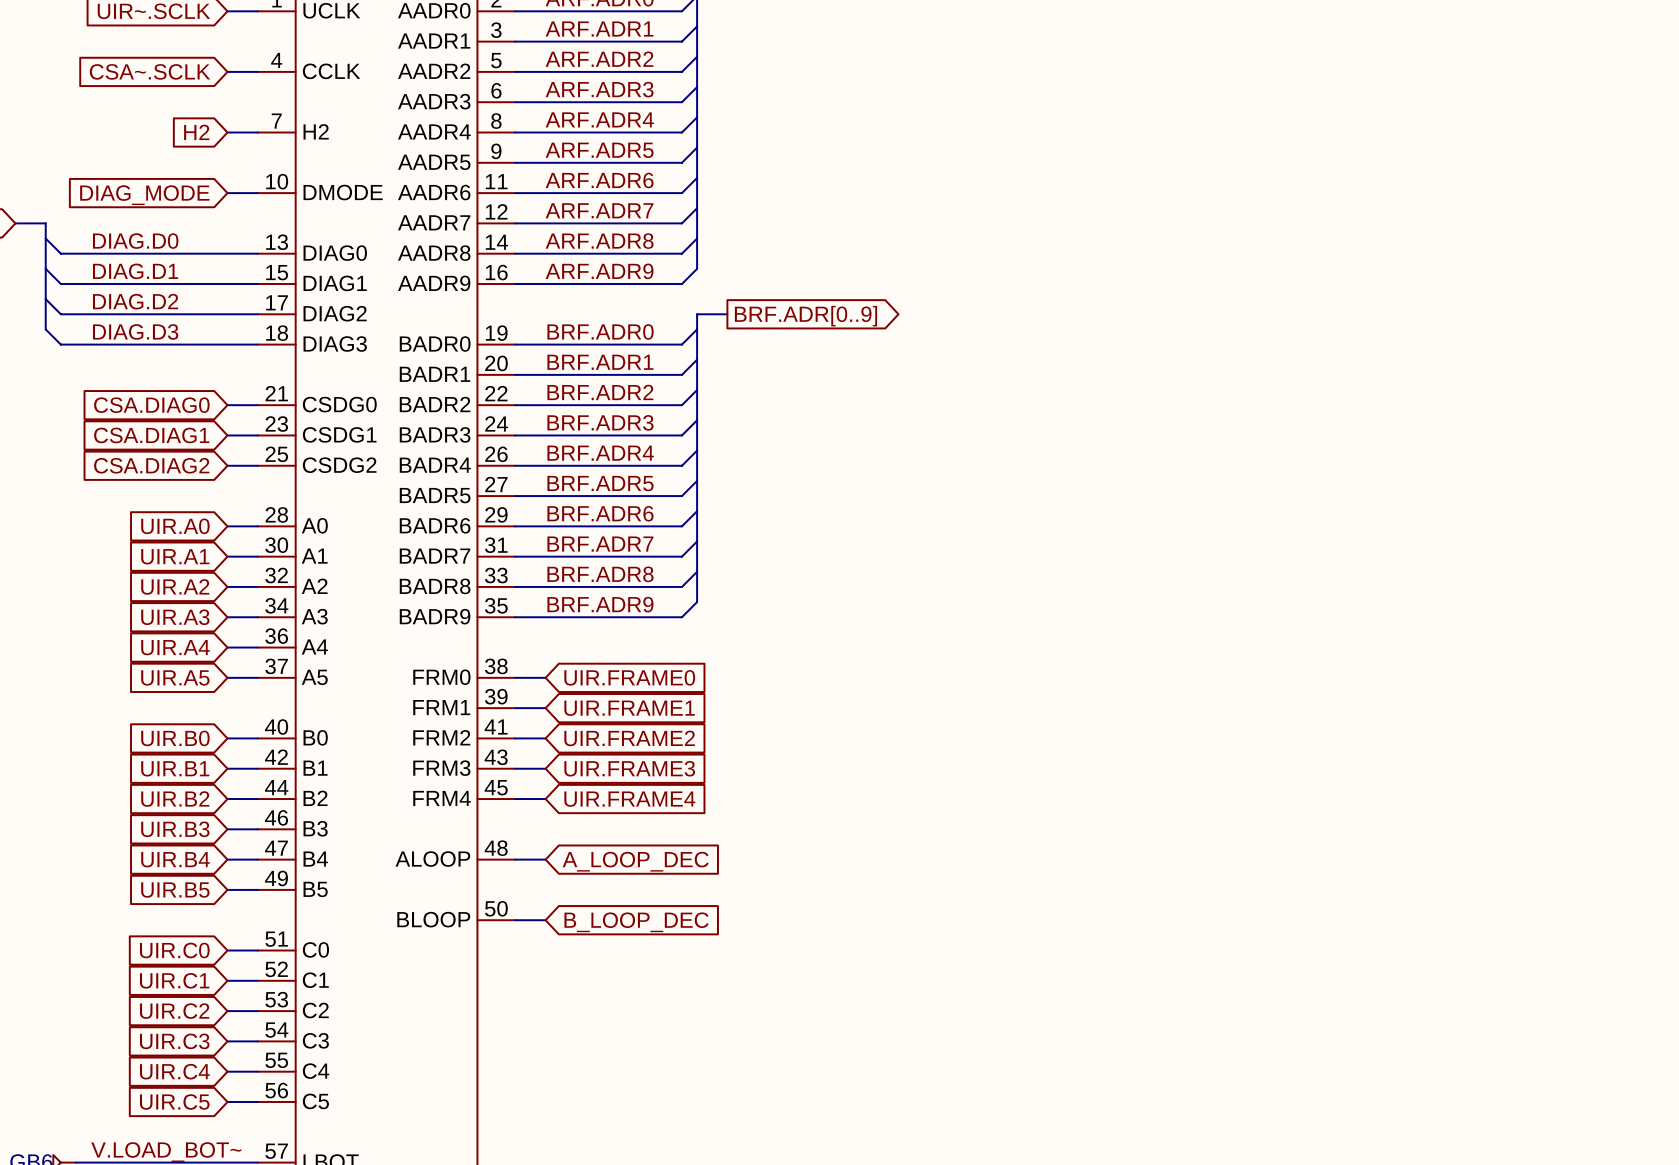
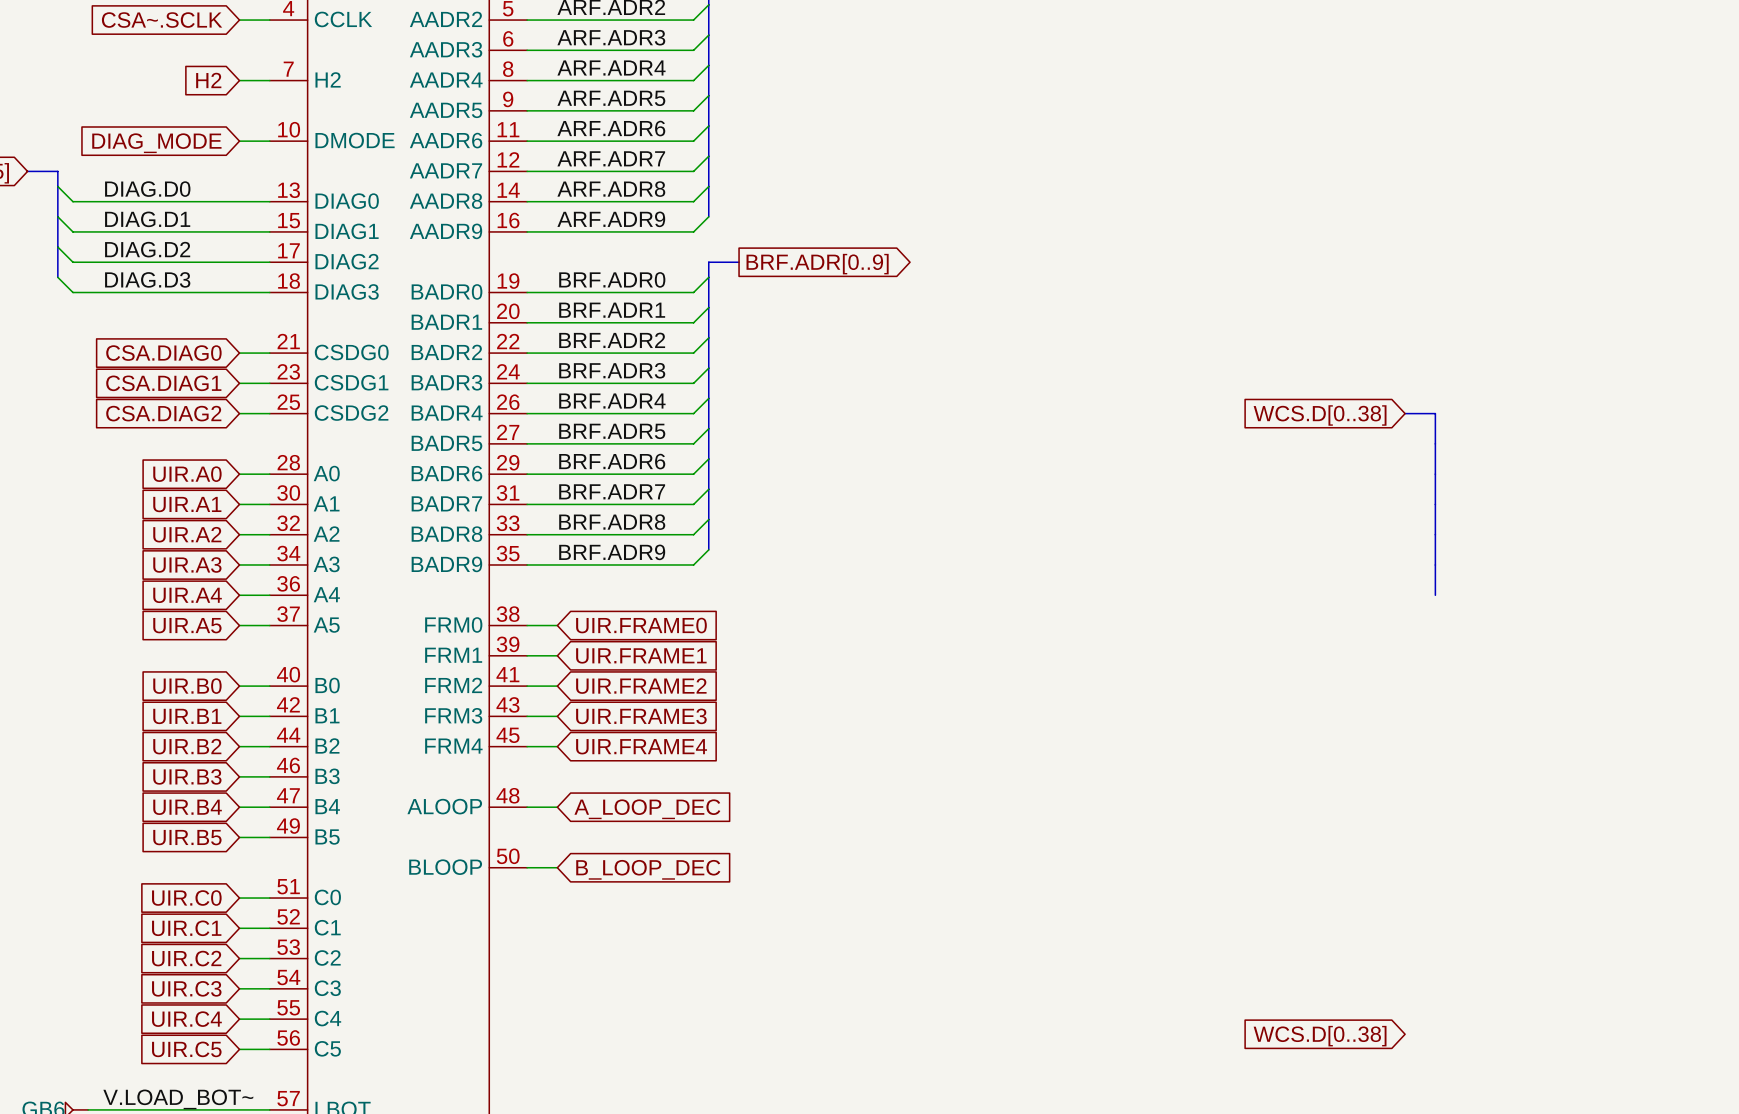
bus: none -> (1405, 413) (1435, 413) (1435, 595)
global label: none -> WCS.D[0..38] (1320, 415)
global label: none -> WCS.D[0..38] (1320, 1036)

